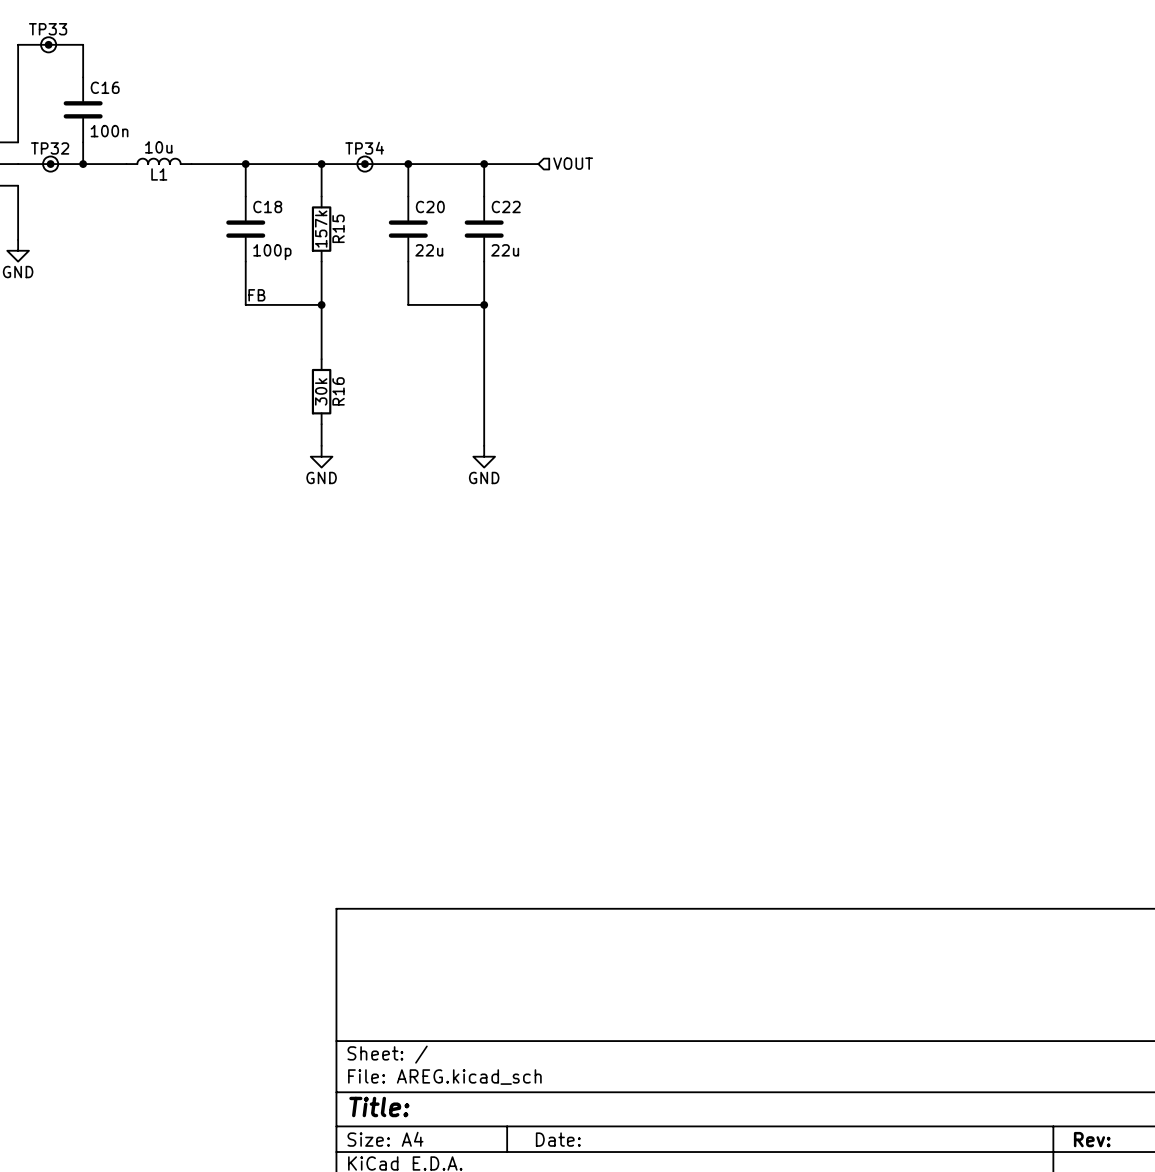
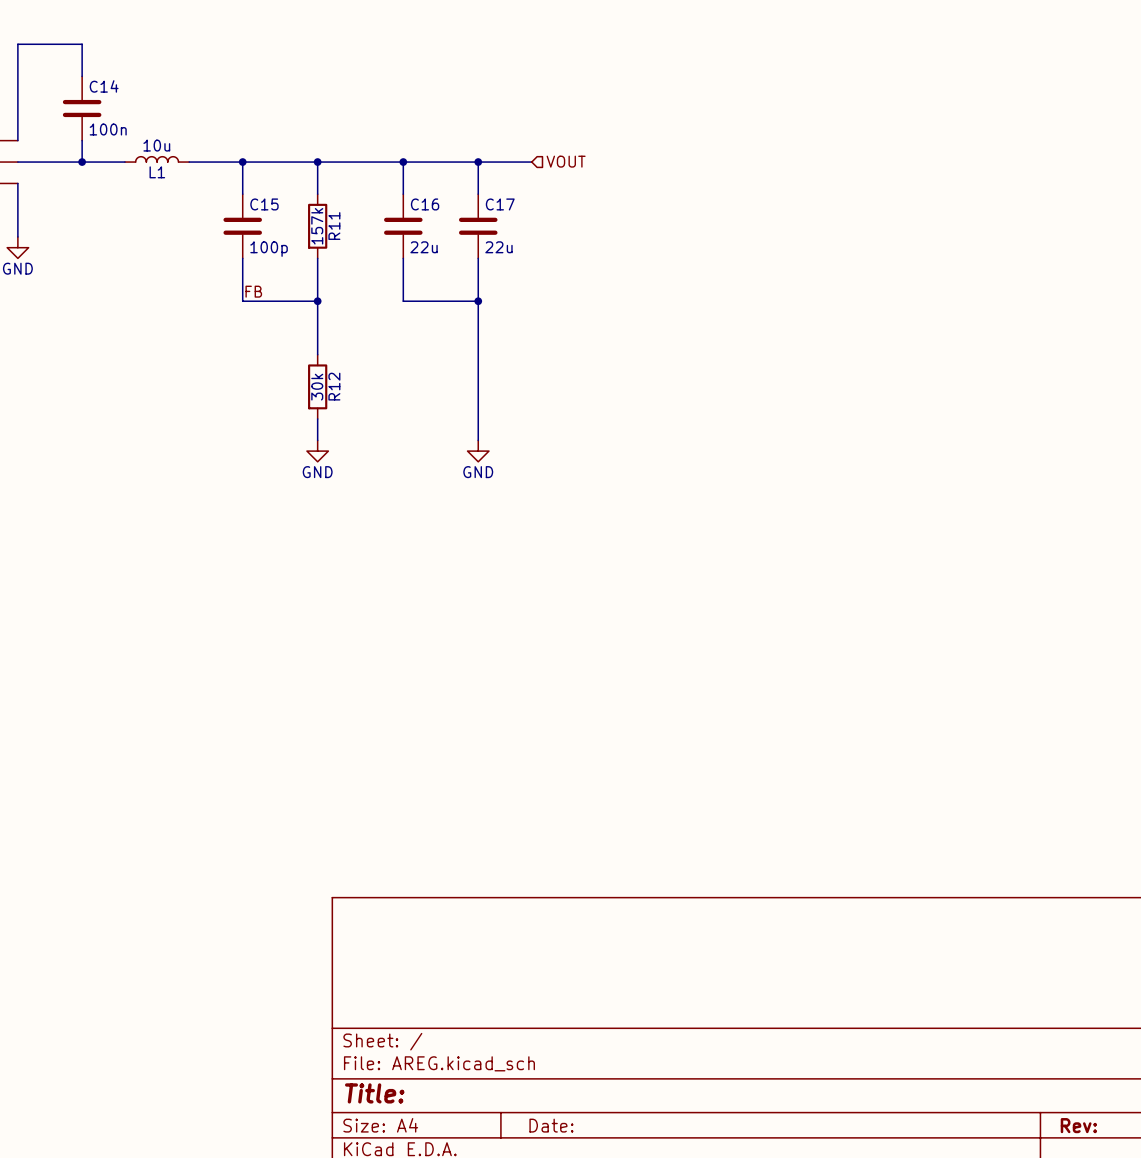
junction: (48, 44) -> none
TP33: (48, 44) -> none
C16 name: C16 (105, 87) -> C14 (104, 86)
junction: (50, 164) -> none
TP32: (50, 164) -> none
junction: (364, 164) -> none
TP34: (364, 164) -> none
C18 name: C18 (267, 207) -> C15 (264, 204)
C20 name: C20 (430, 207) -> C16 (425, 204)
C22 name: C22 (506, 207) -> C17 (500, 204)
R15 name: R15 (338, 228) -> R11 (334, 226)
R16 name: R16 (338, 391) -> R12 (334, 386)

